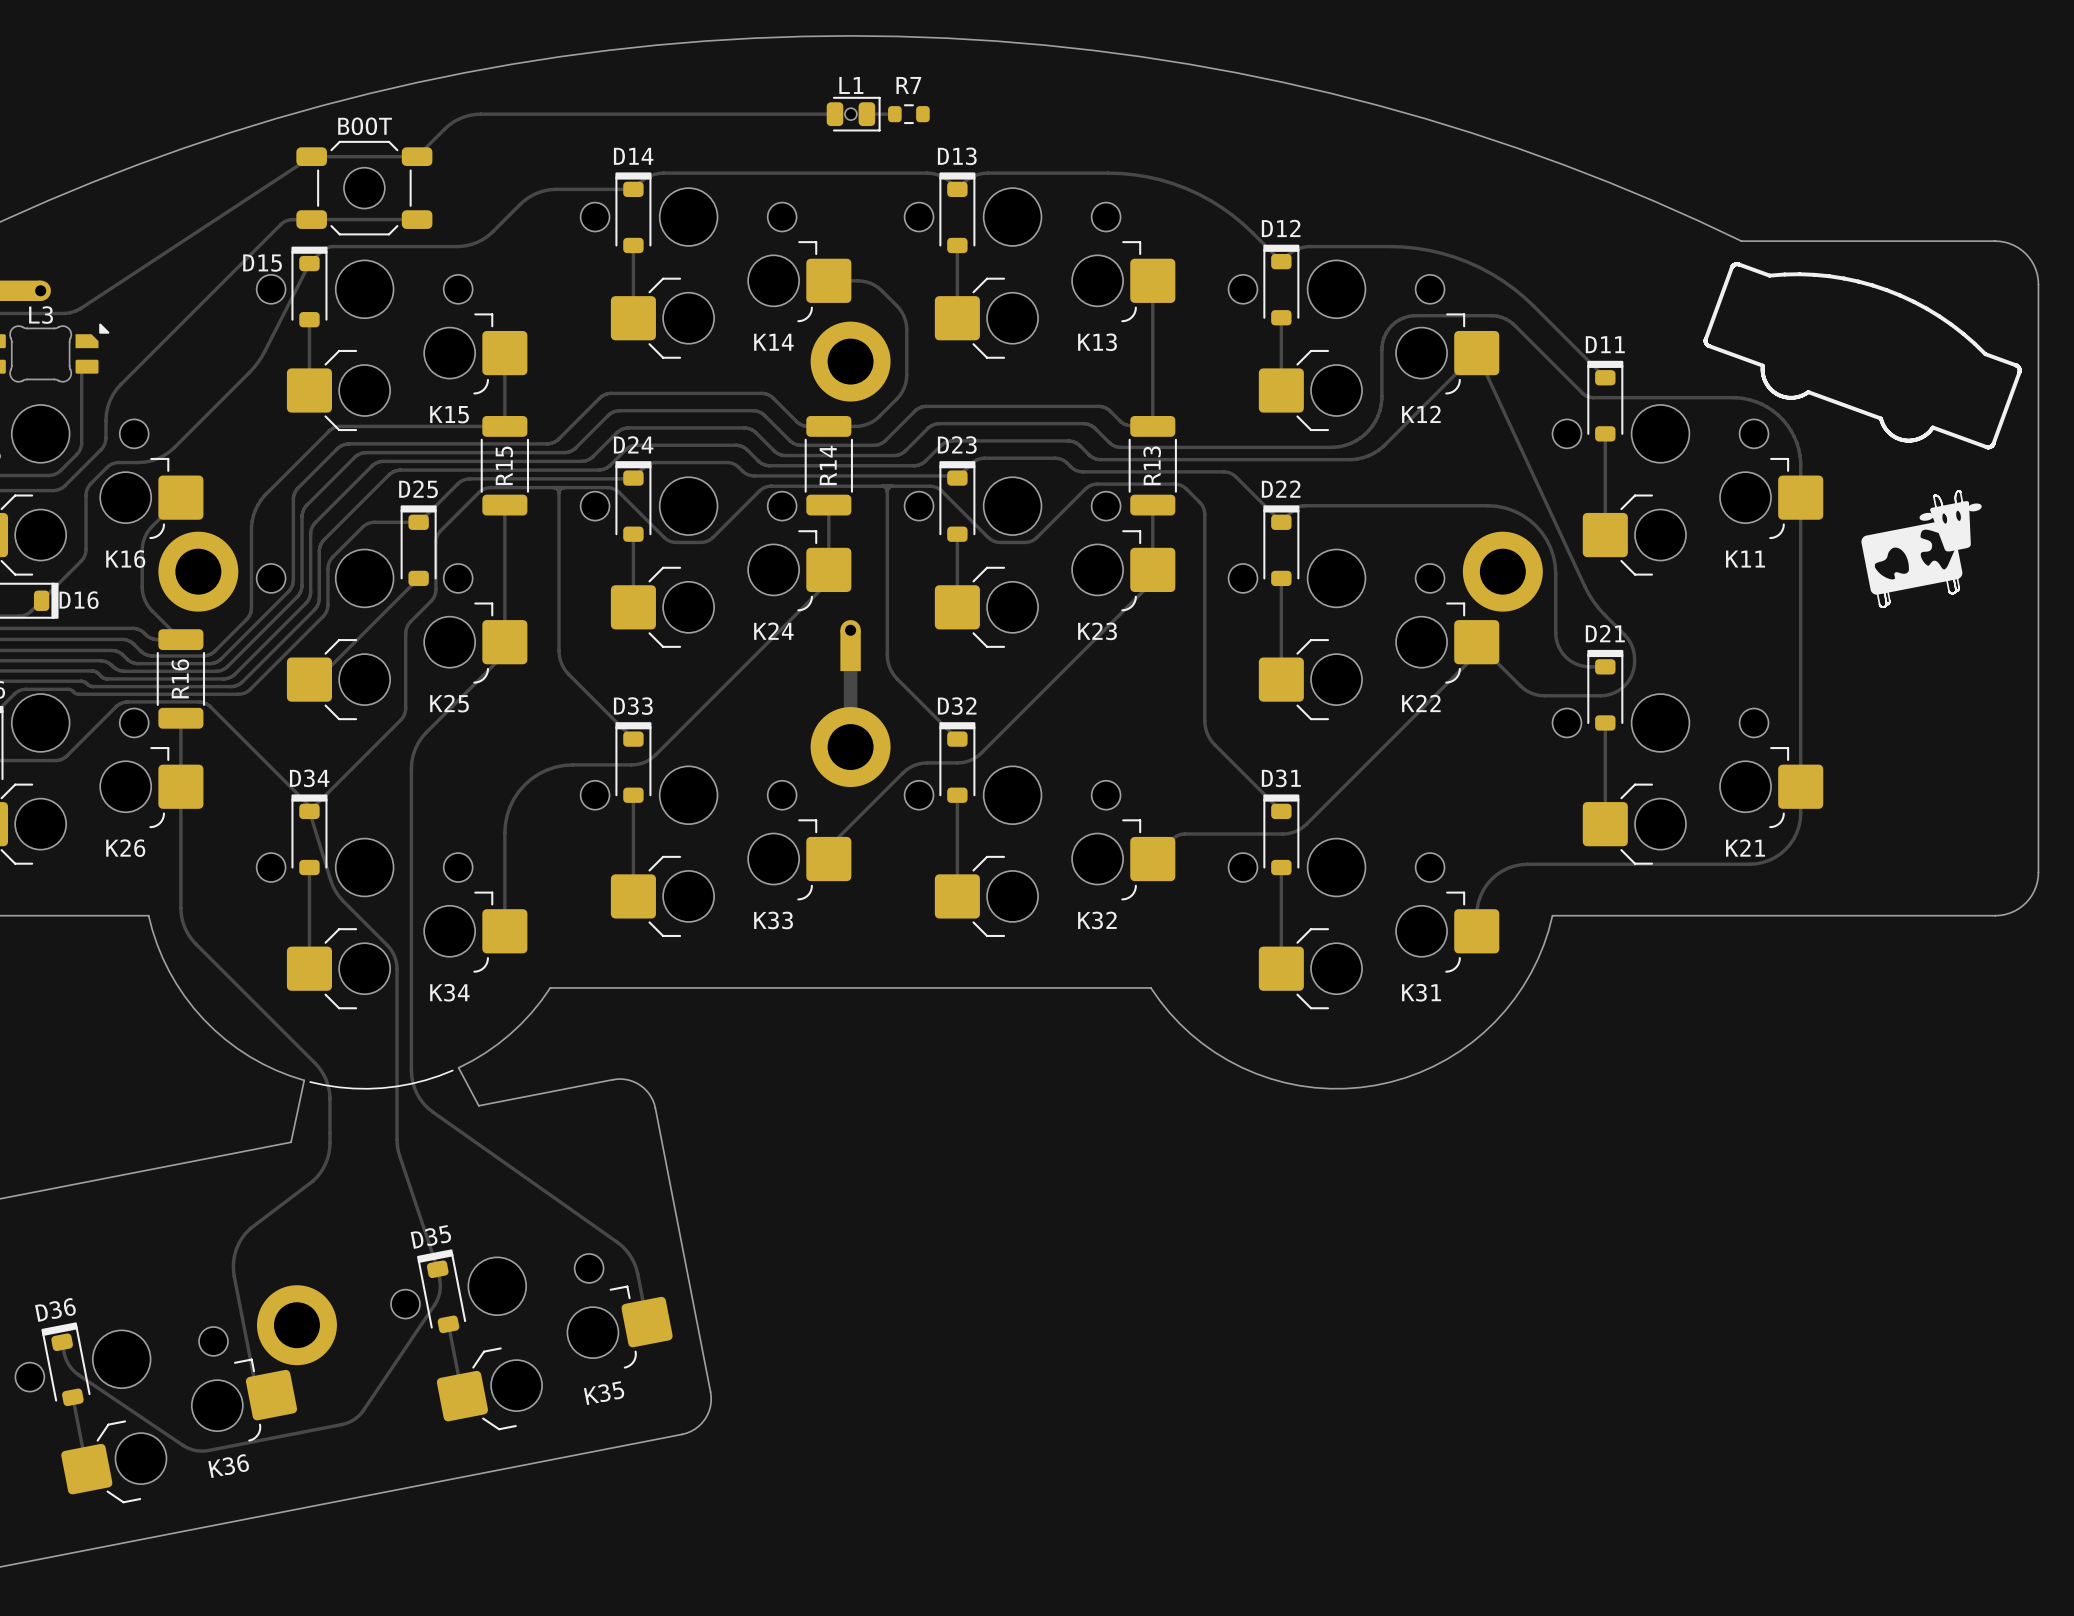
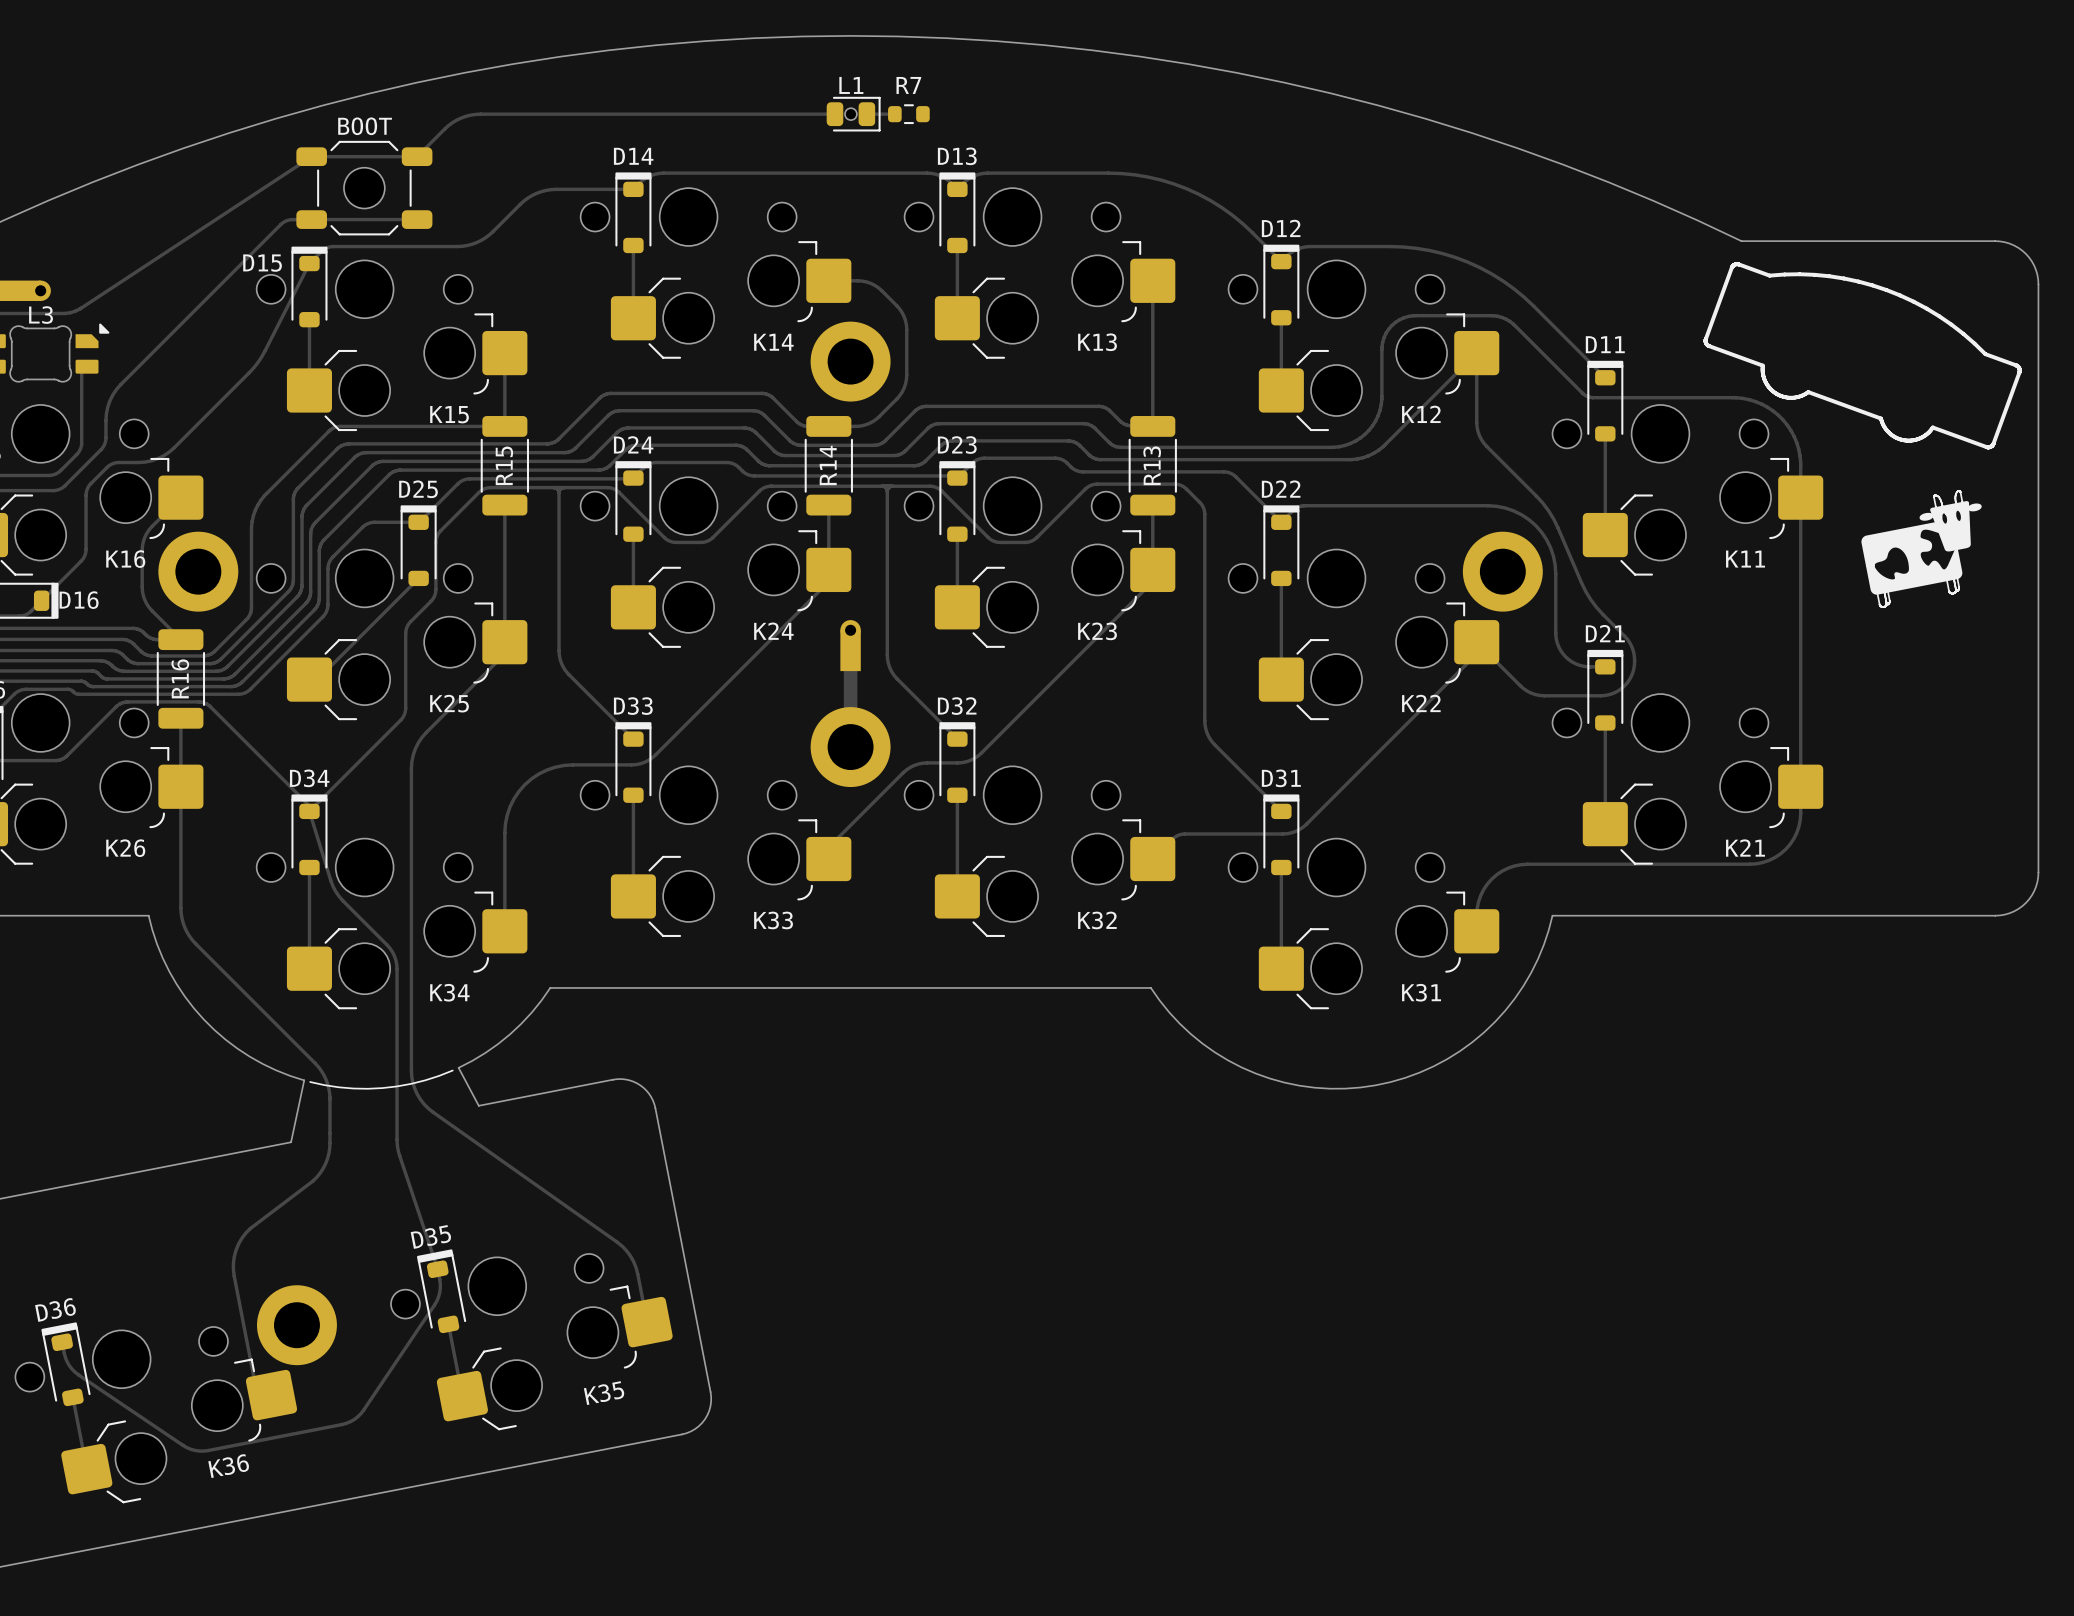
track: (1476, 353) (1584, 586) (1599, 608) (1627, 638) (1633, 650) (1634, 660) -> (1476, 353) (1476, 422) (1481, 439) (1548, 511) (1585, 591) (1596, 607) (1628, 641) (1634, 660)

